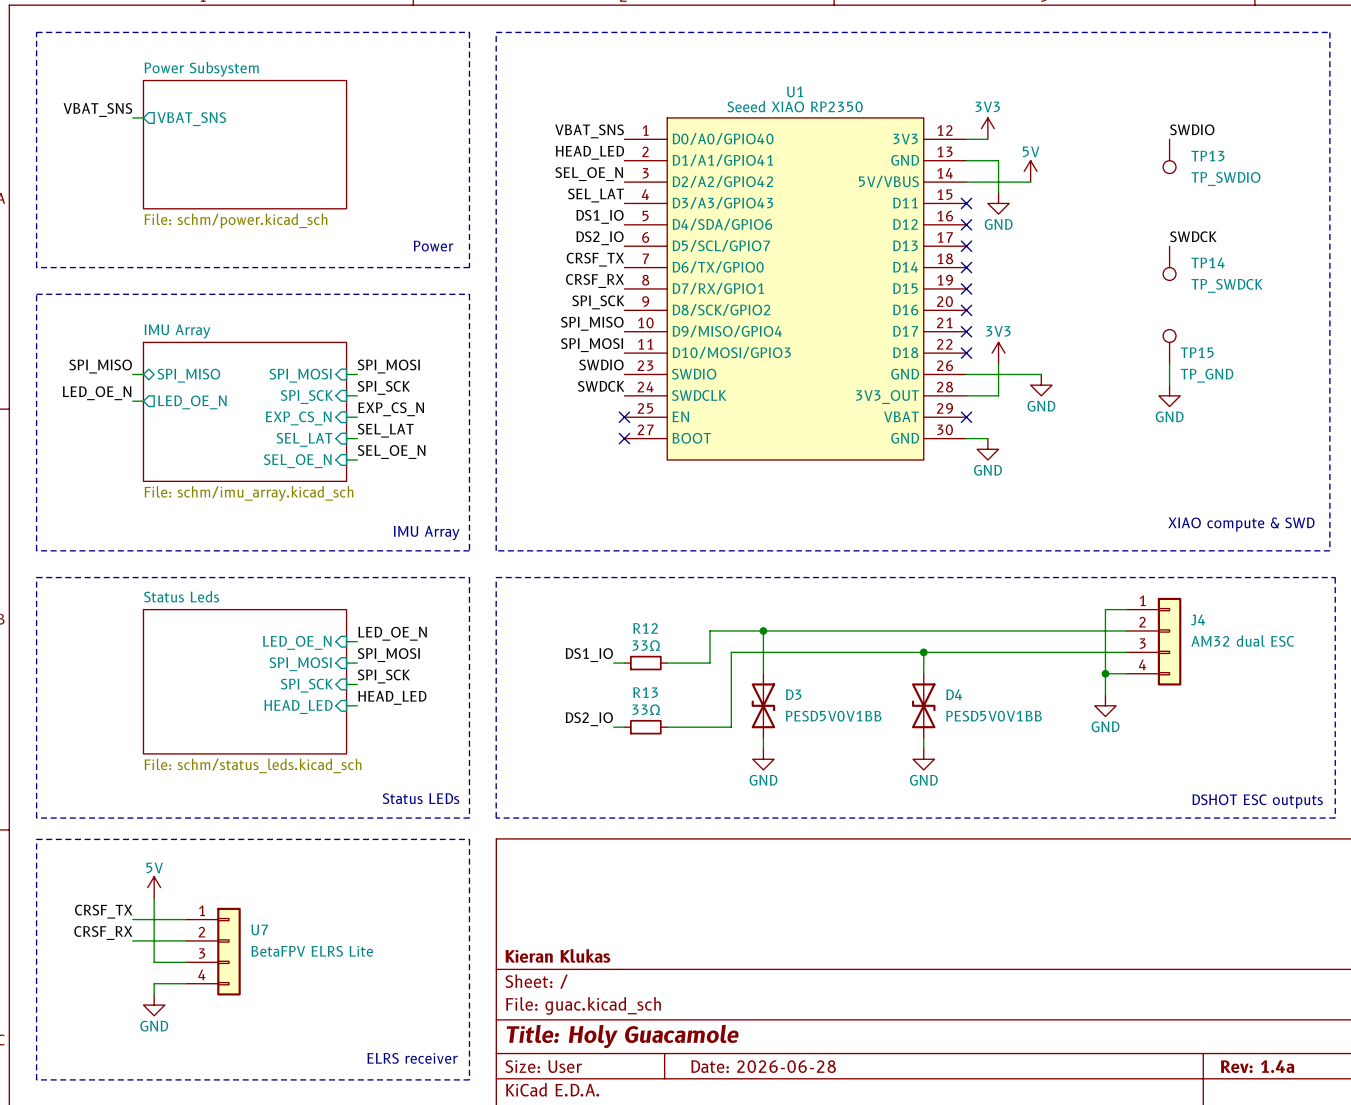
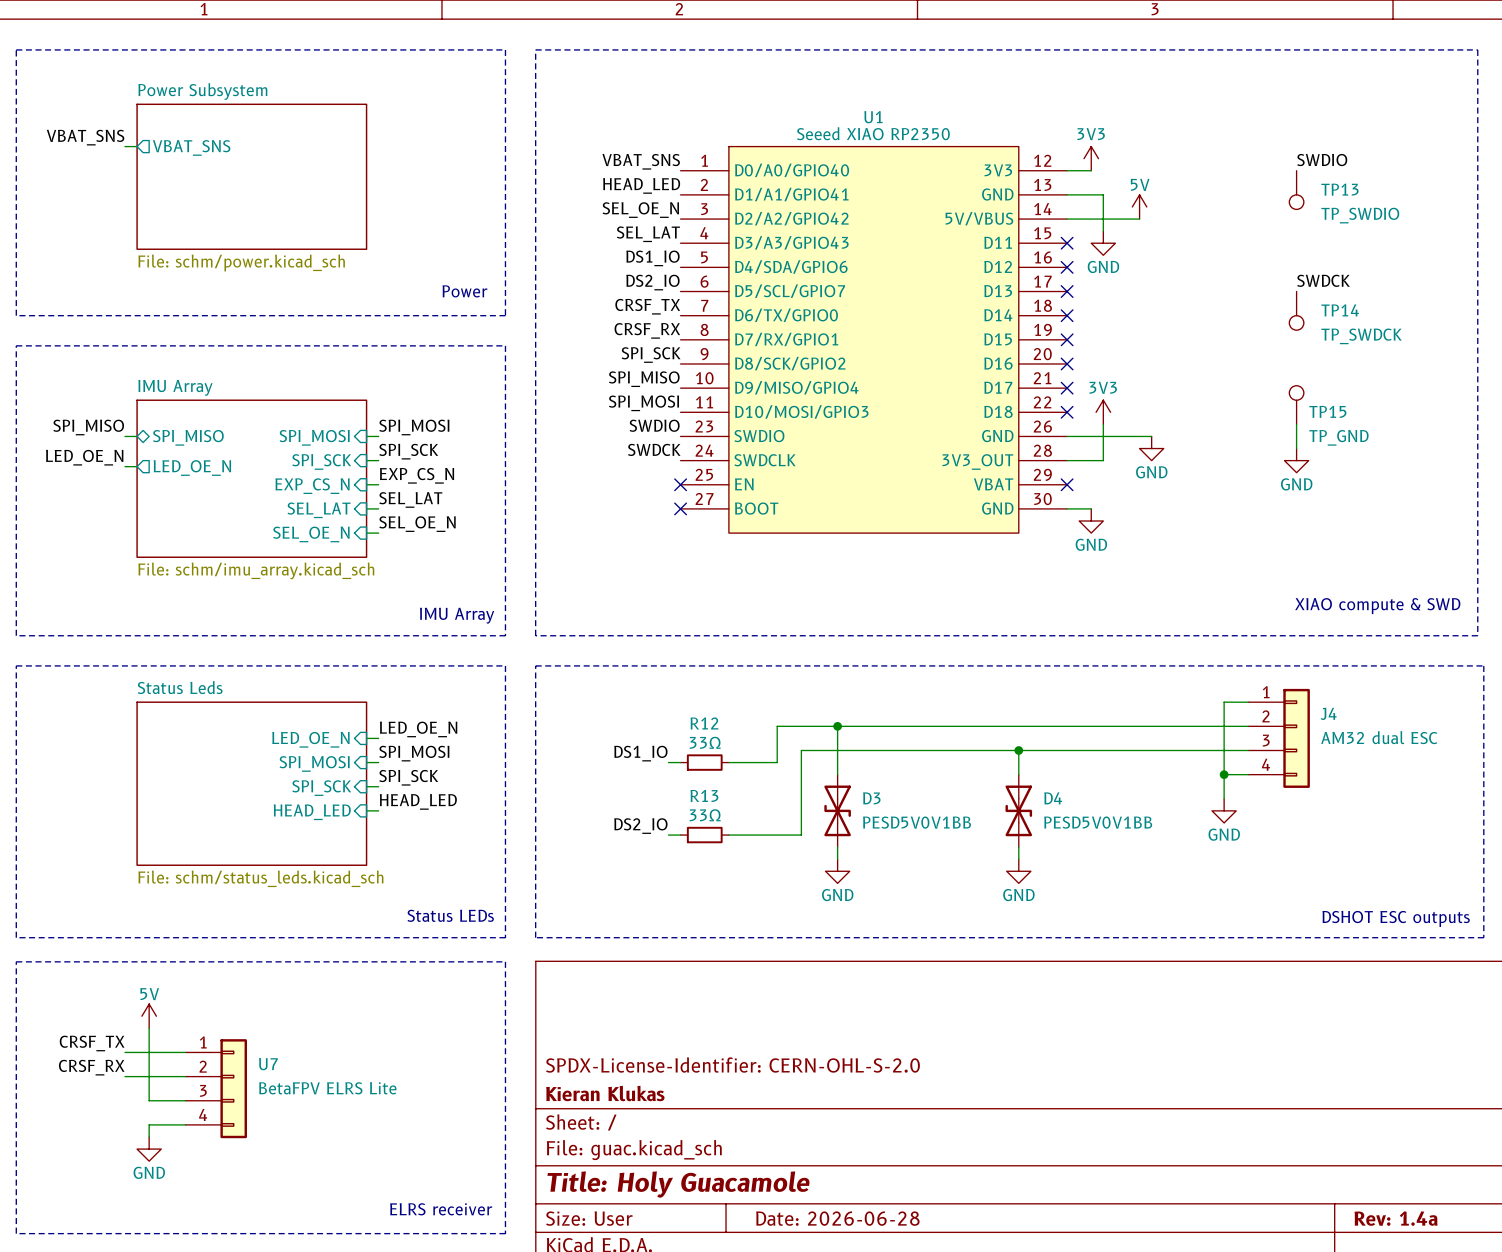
title block: none -> SPDX-License-Identifier: CERN-OHL-S-2.0 (732, 1065)

